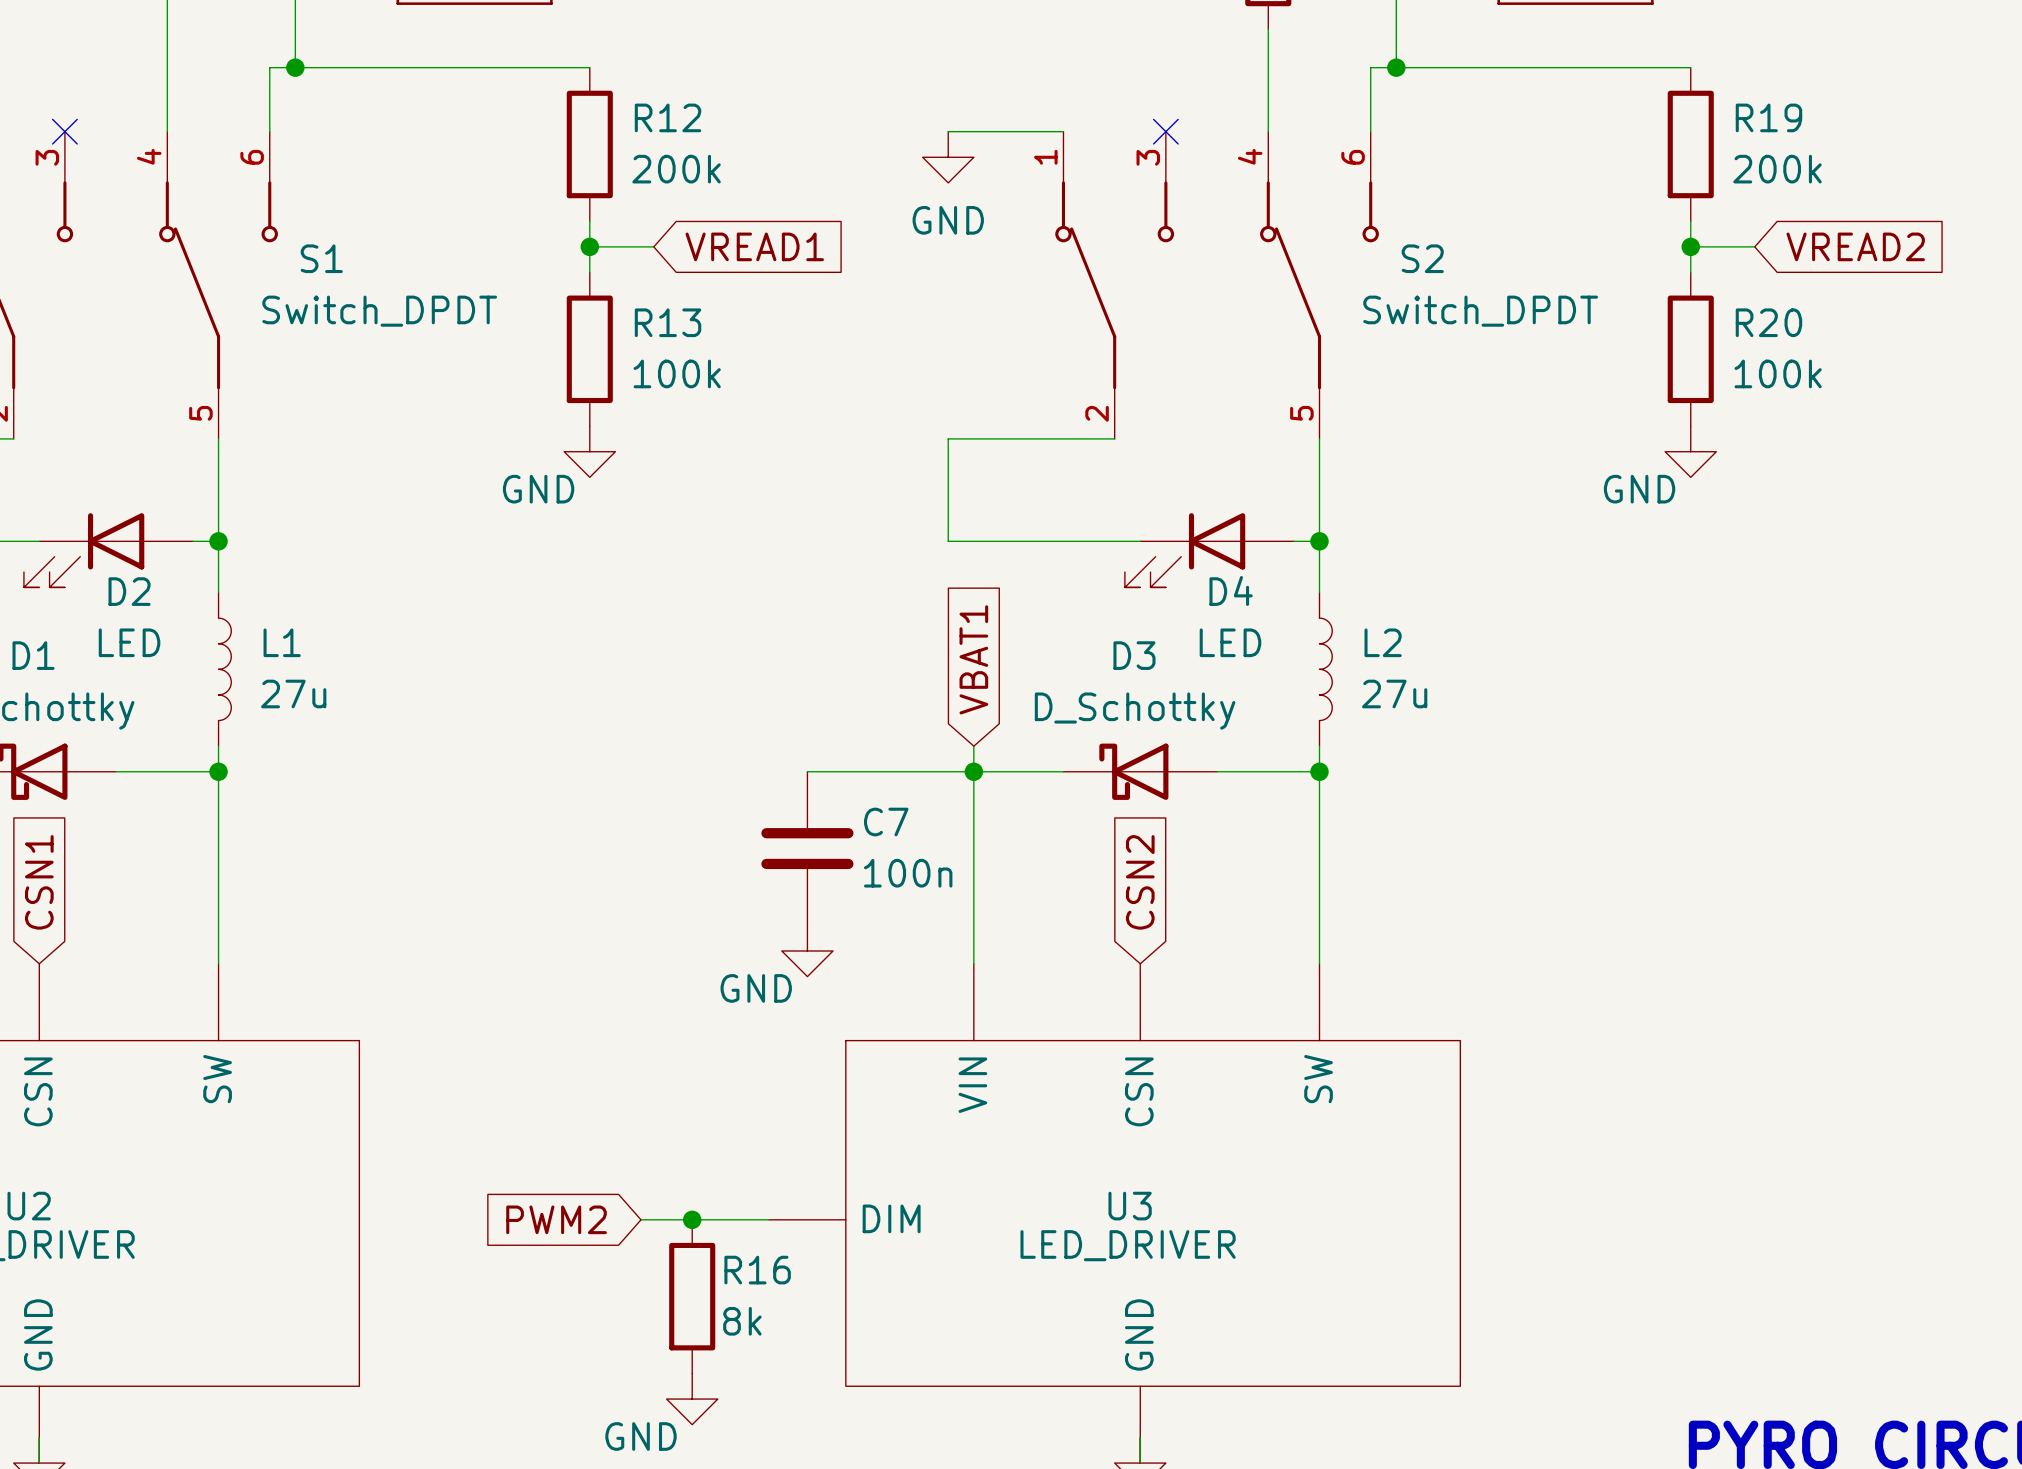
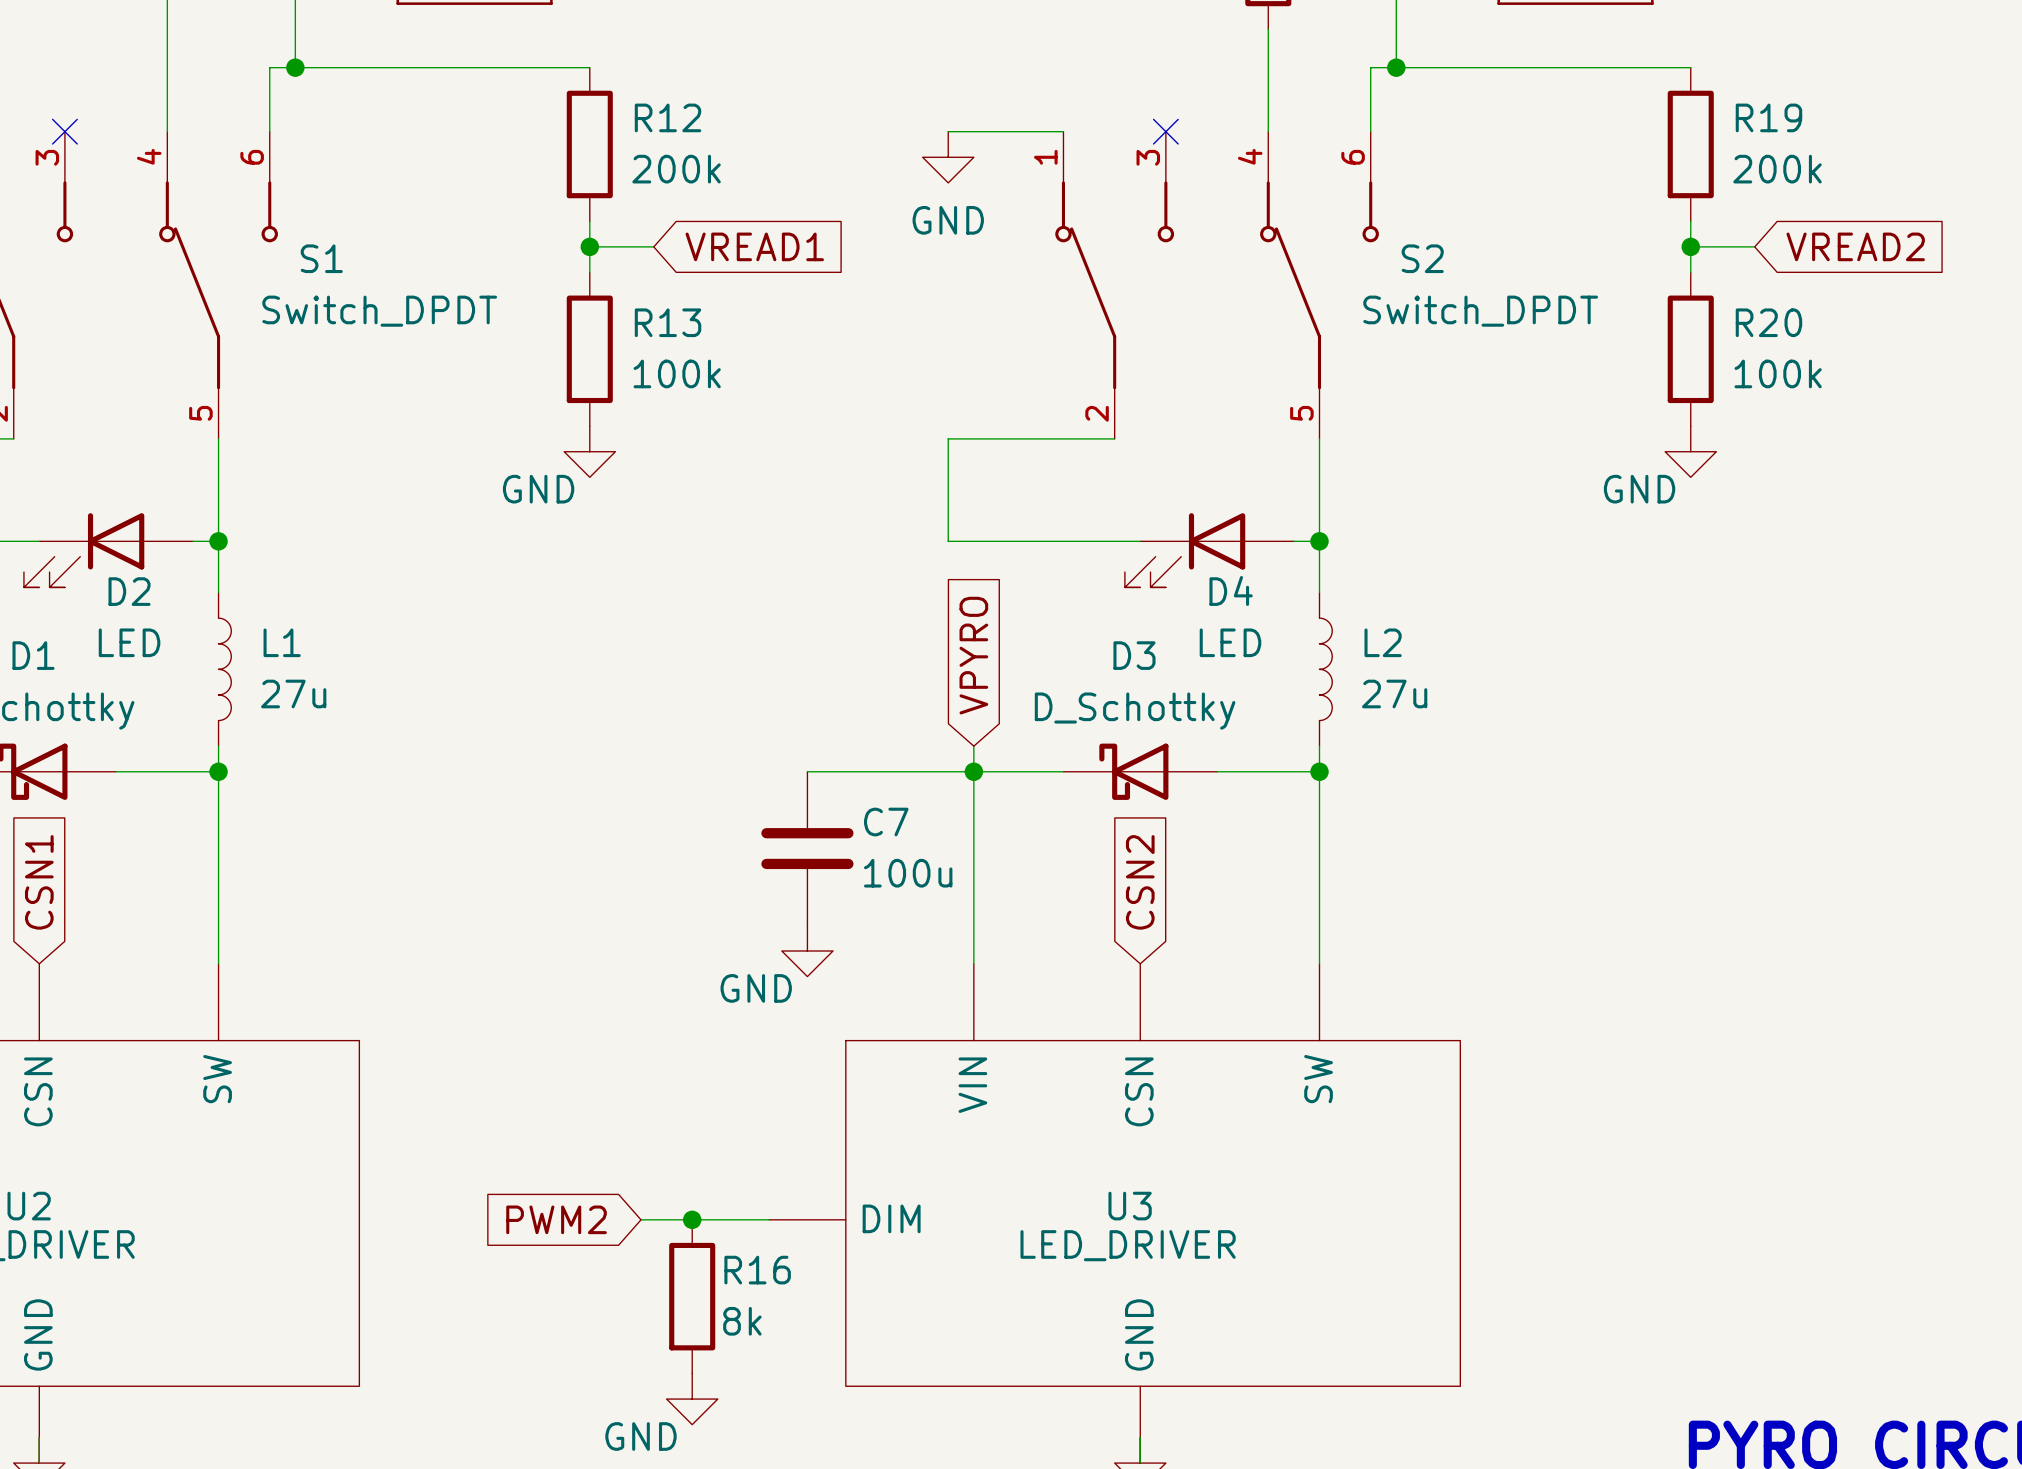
global label: VBAT1 (973, 659) -> VPYRO (973, 655)
C7 value: 100n (908, 873) -> 100u (908, 873)

